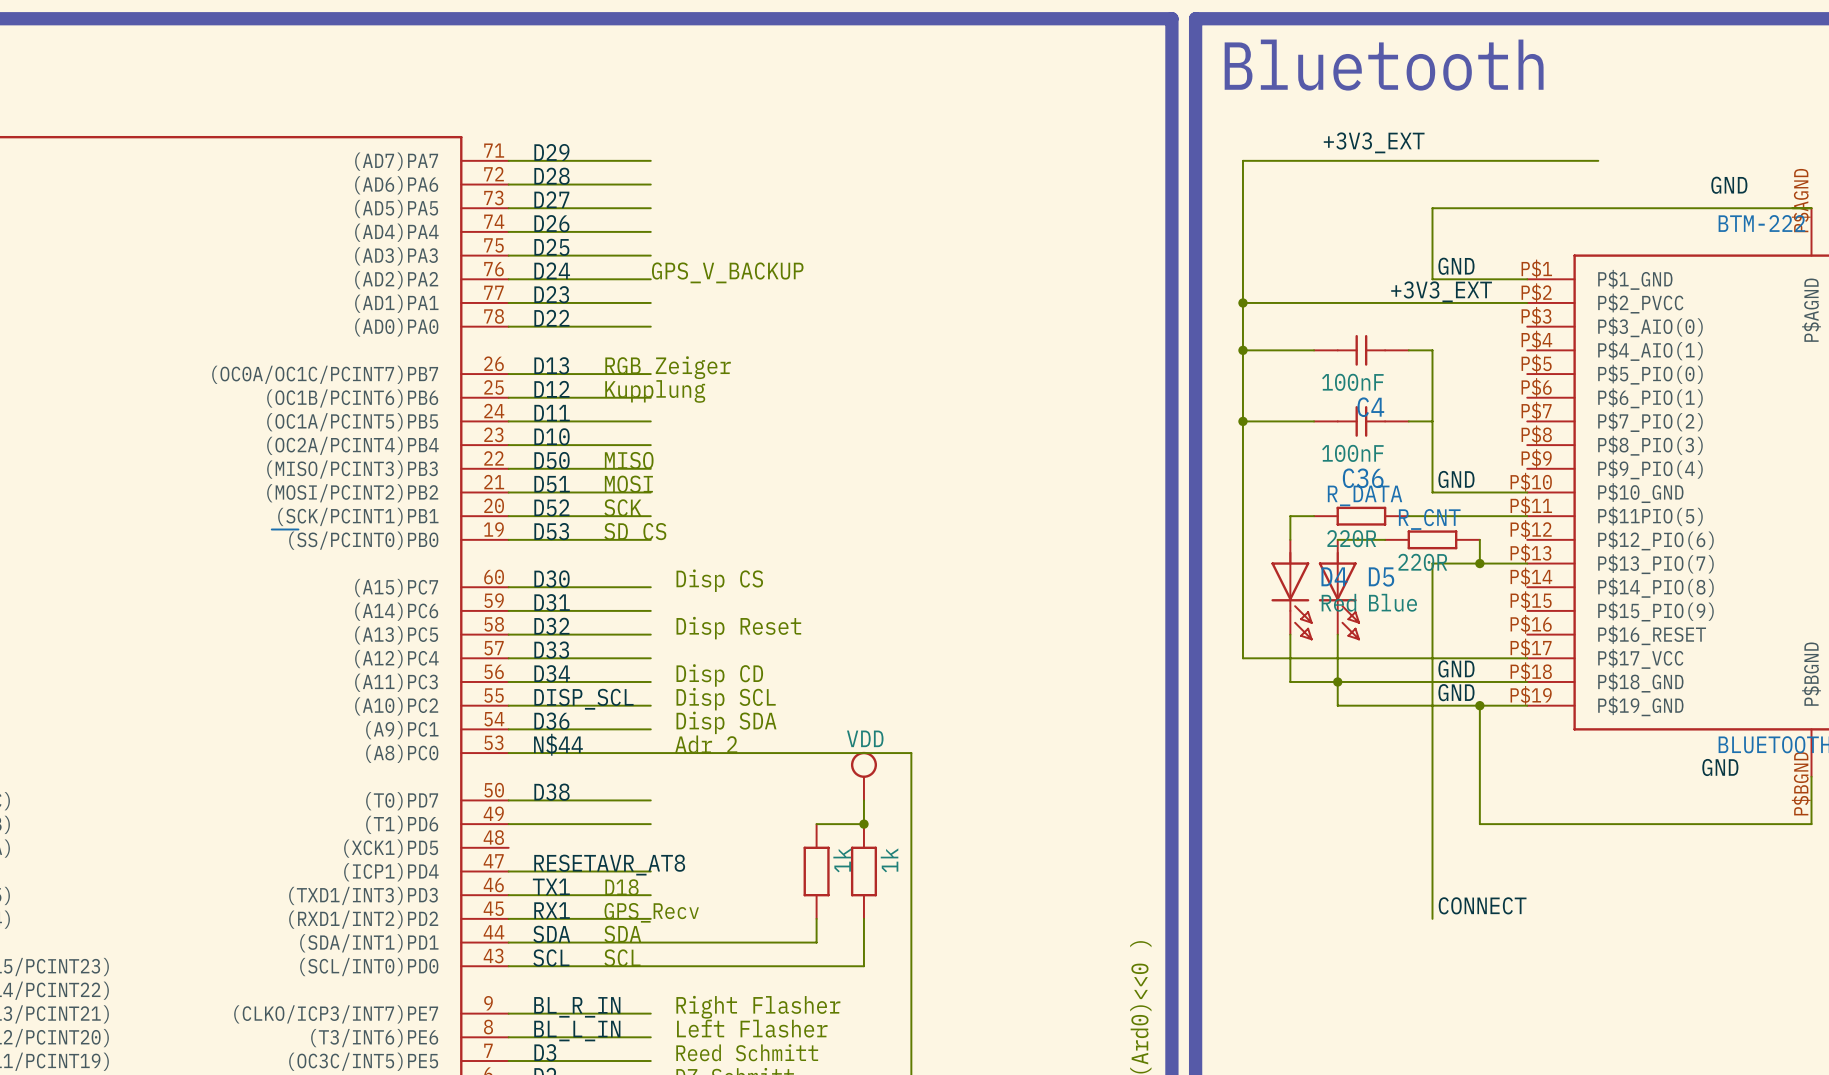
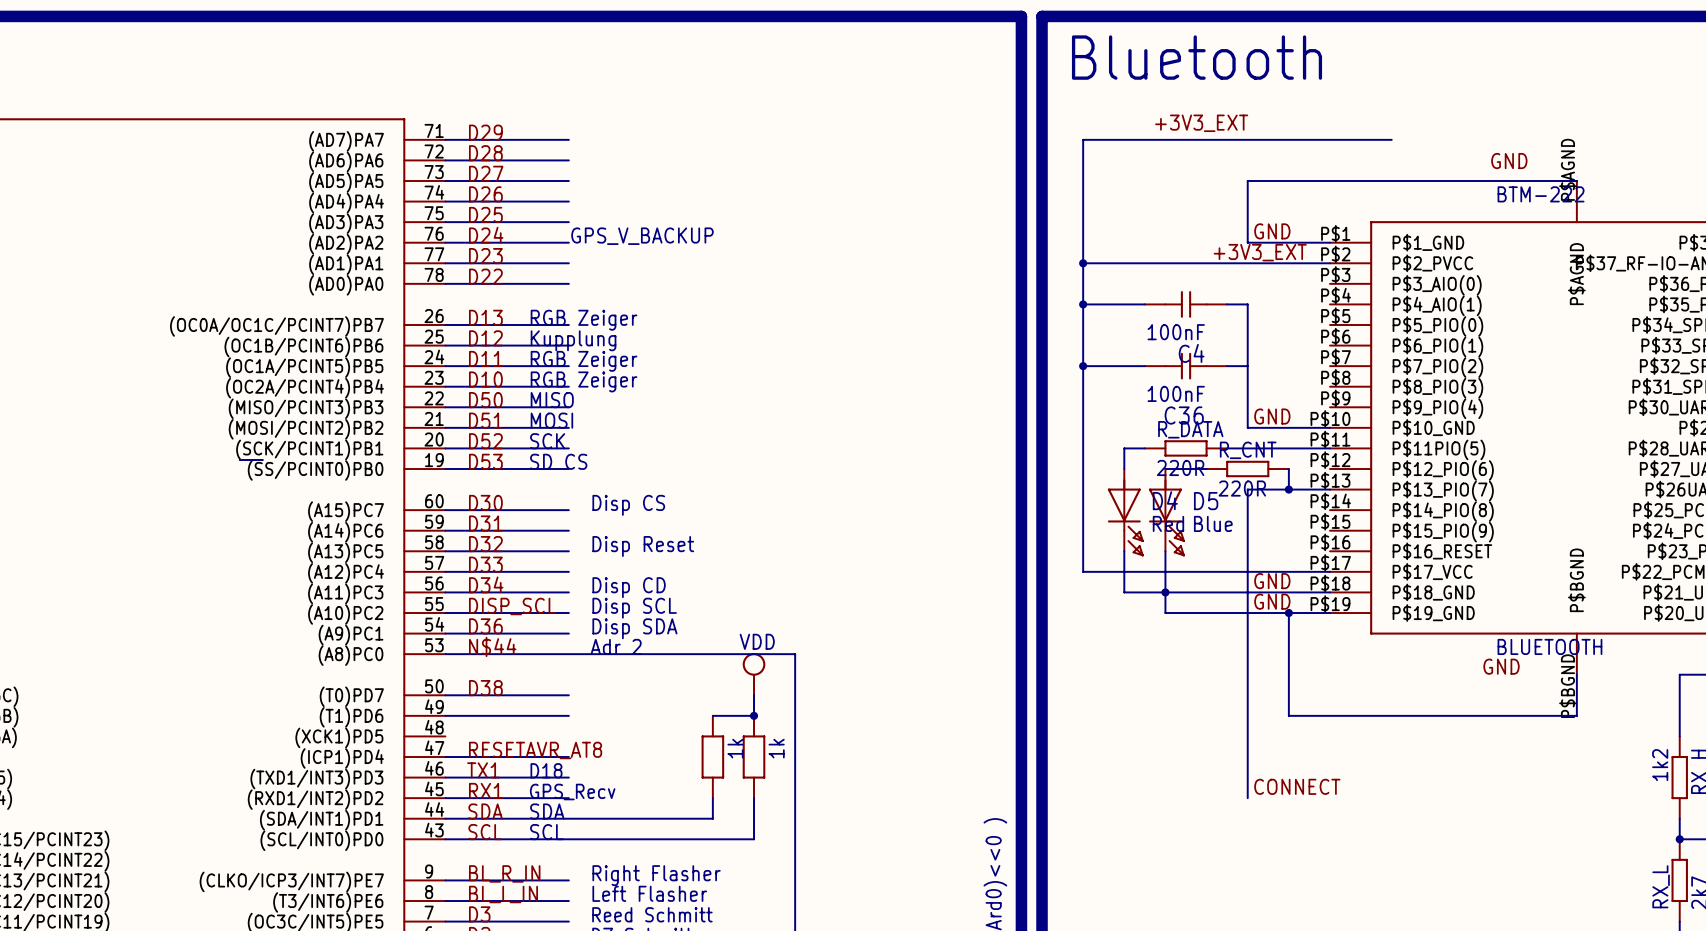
text: none -> RGB Zeiger (584, 361)
text: none -> RGB Zeiger (584, 381)

